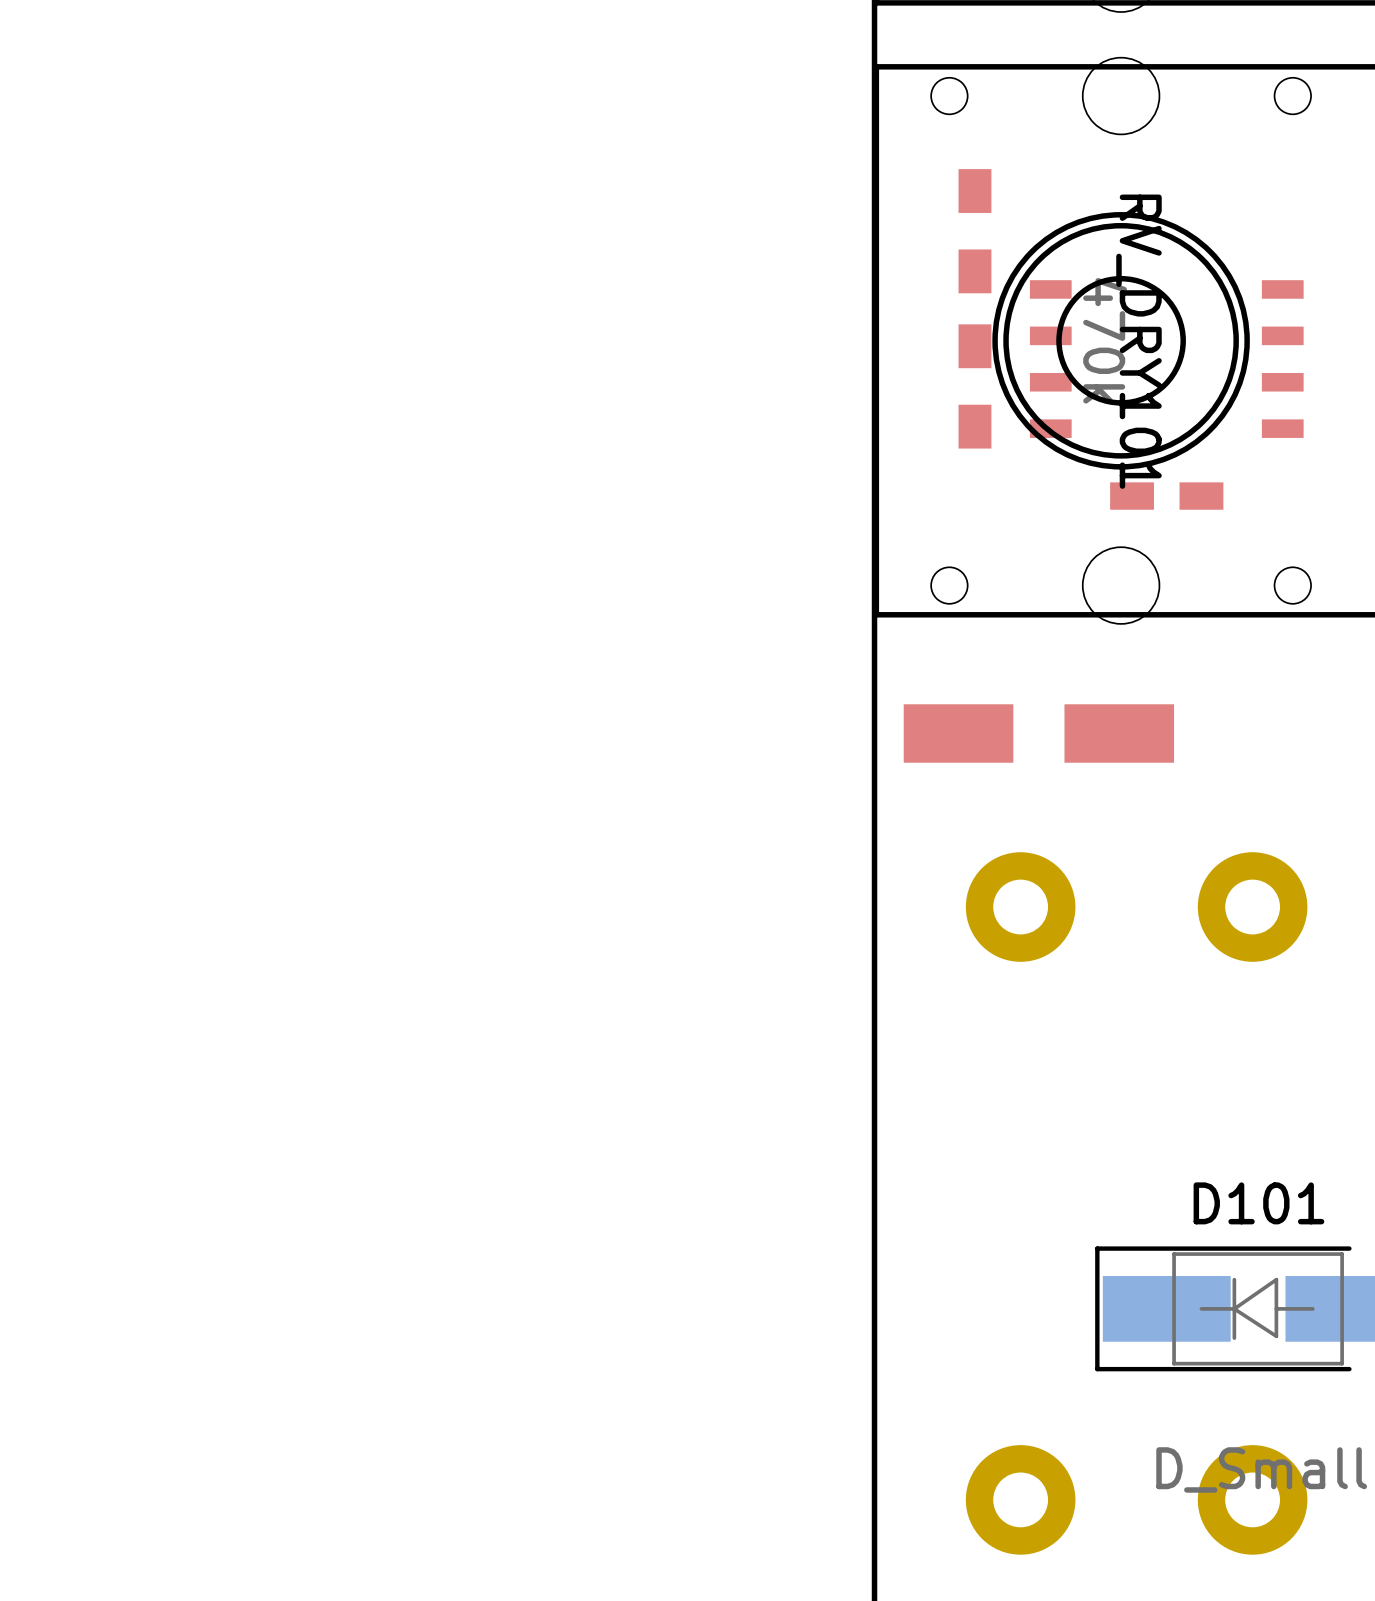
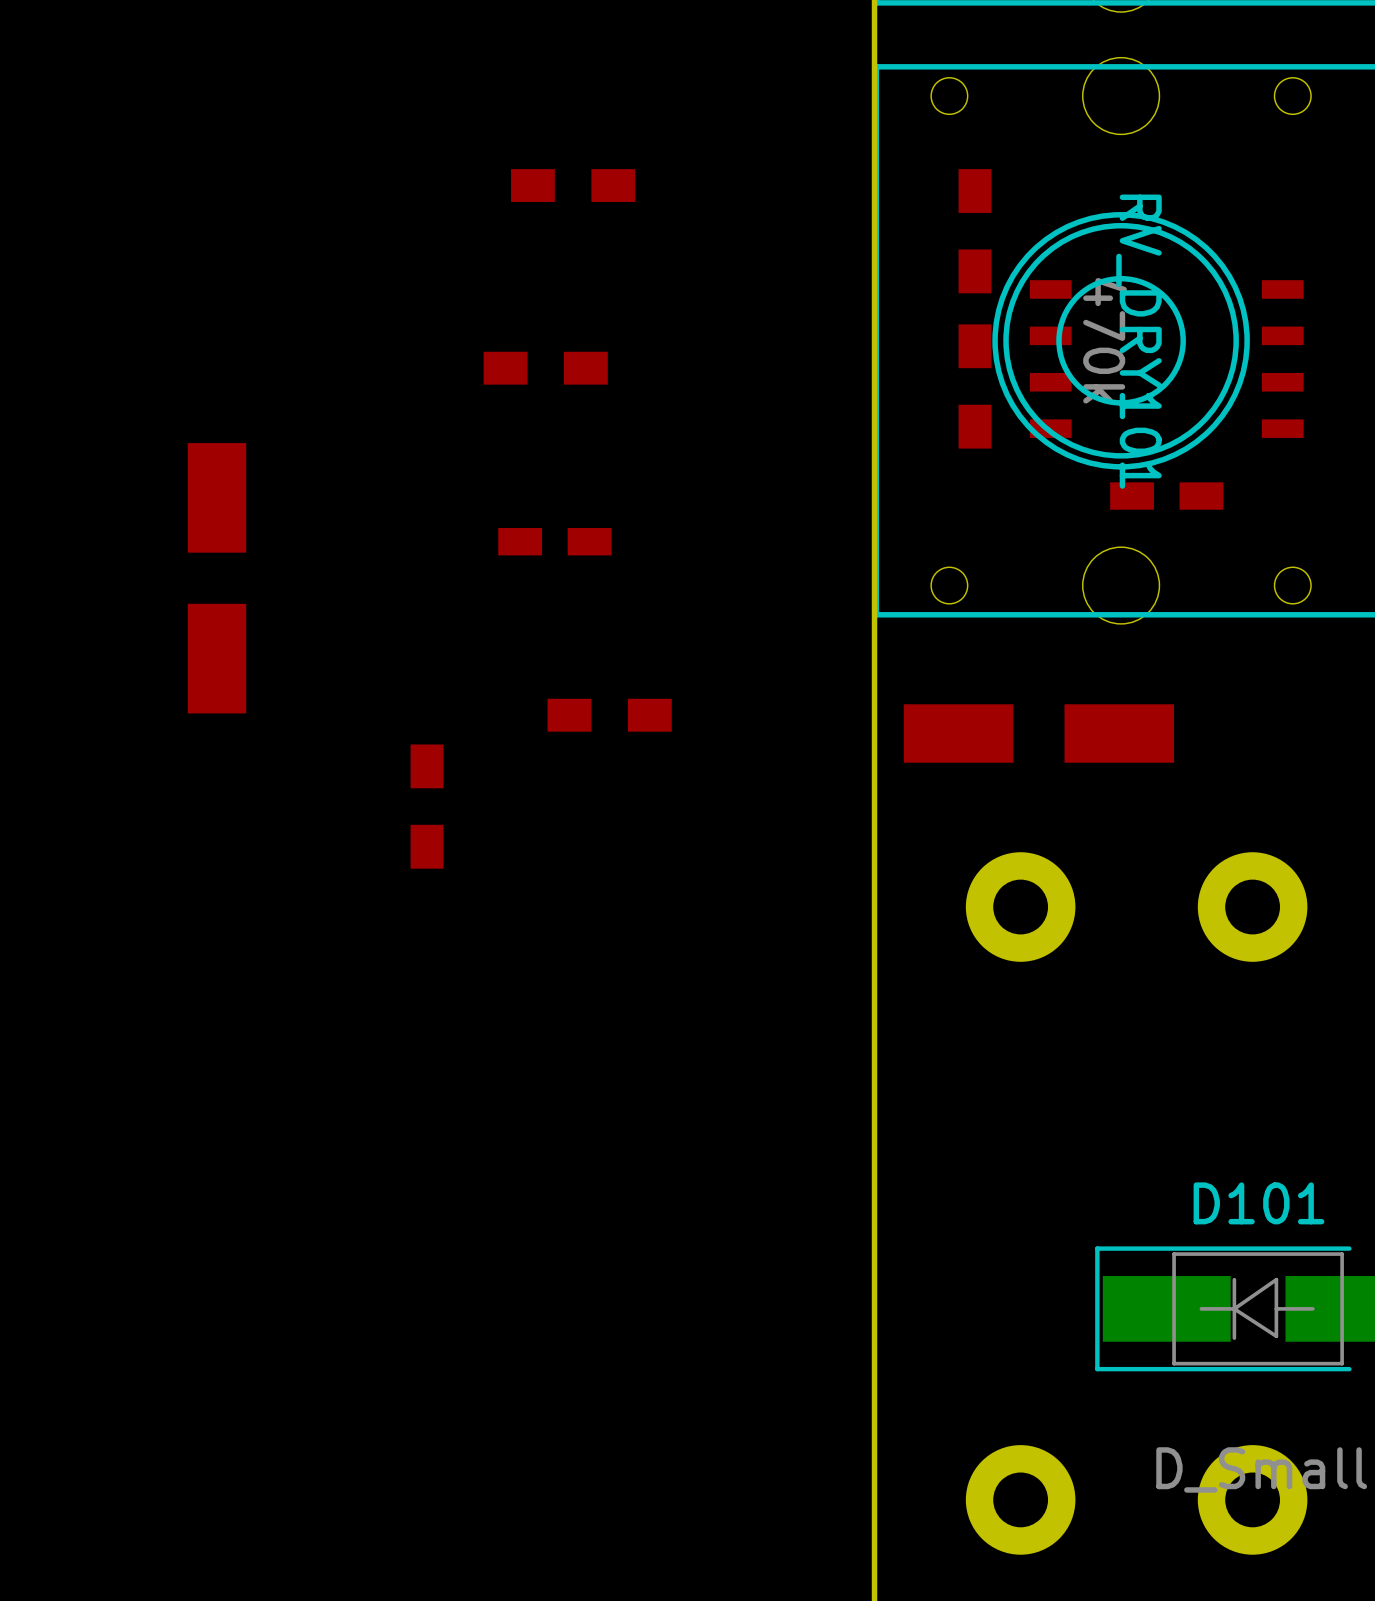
part: none -> (573, 185)
part: none -> (545, 368)
part: none -> (554, 541)
part: none -> (216, 578)
part: none -> (609, 715)
part: none -> (427, 806)

